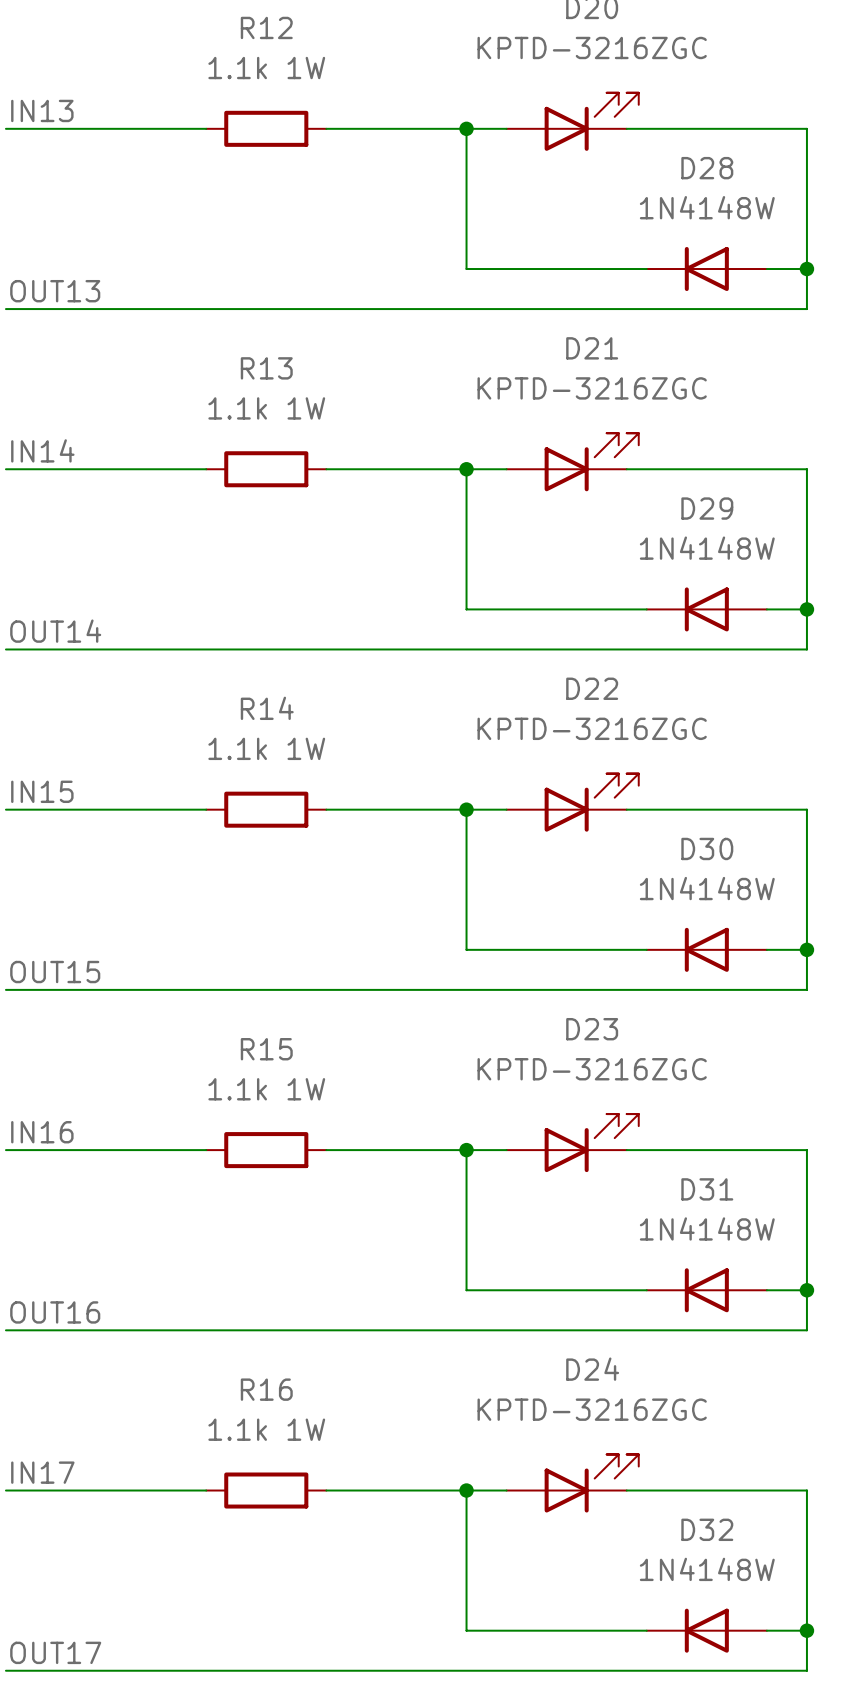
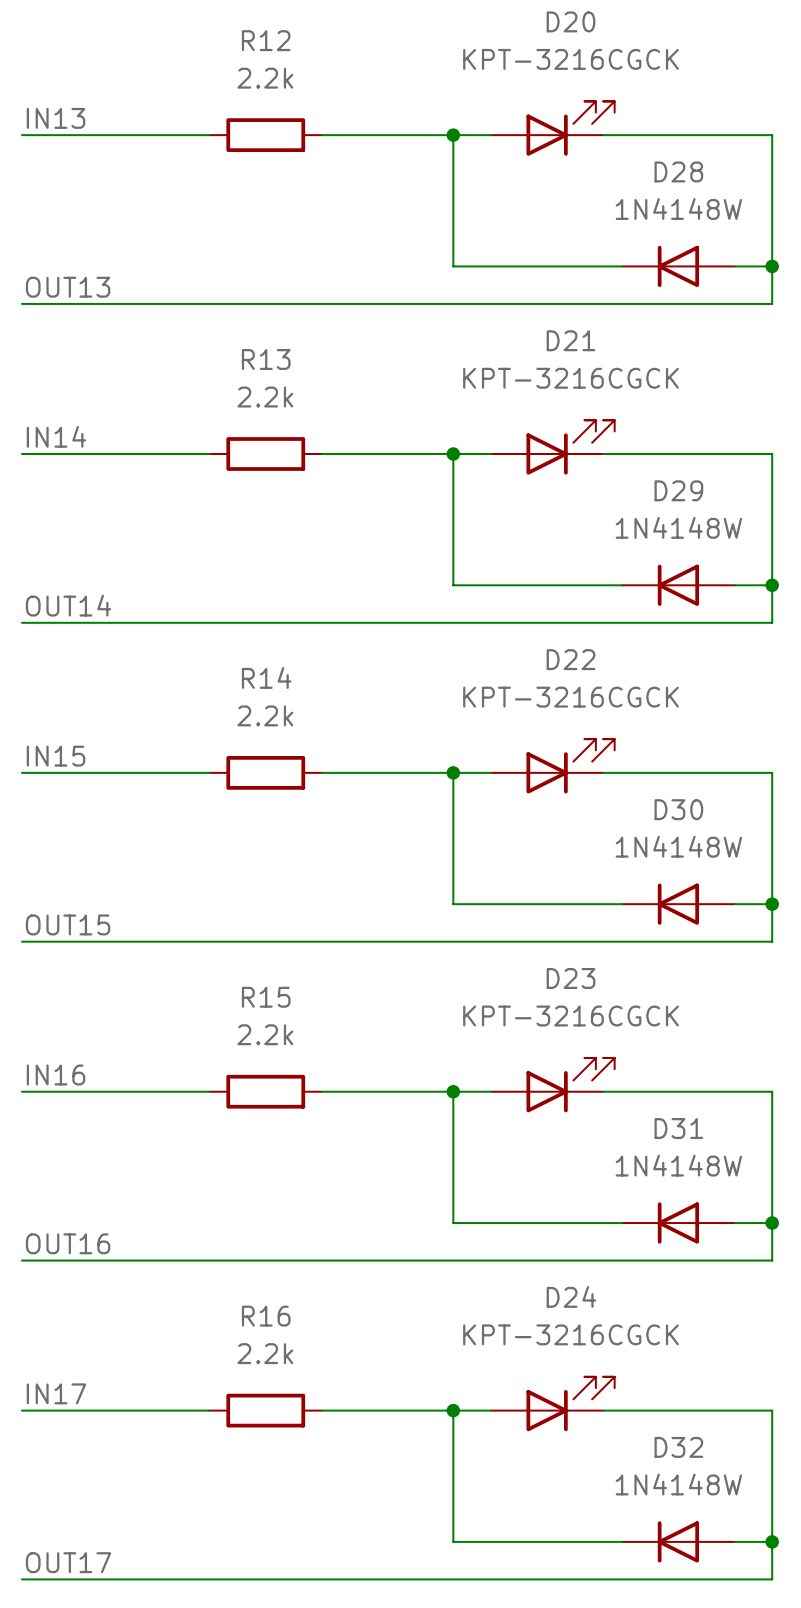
D20 value: KPTD-3216ZGC (592, 47) -> KPT-3216CGCK (571, 59)
R12 value: 1.1k 1W (266, 68) -> 2.2k (265, 78)
D21 value: KPTD-3216ZGC (592, 388) -> KPT-3216CGCK (571, 378)
R13 value: 1.1k 1W (266, 408) -> 2.2k (265, 397)
D22 value: KPTD-3216ZGC (592, 728) -> KPT-3216CGCK (571, 697)
R14 value: 1.1k 1W (266, 748) -> 2.2k (265, 715)
D23 value: KPTD-3216ZGC (592, 1069) -> KPT-3216CGCK (571, 1016)
R15 value: 1.1k 1W (266, 1089) -> 2.2k (265, 1034)
D24 value: KPTD-3216ZGC (592, 1409) -> KPT-3216CGCK (571, 1334)
R16 value: 1.1k 1W (266, 1429) -> 2.2k (265, 1353)

